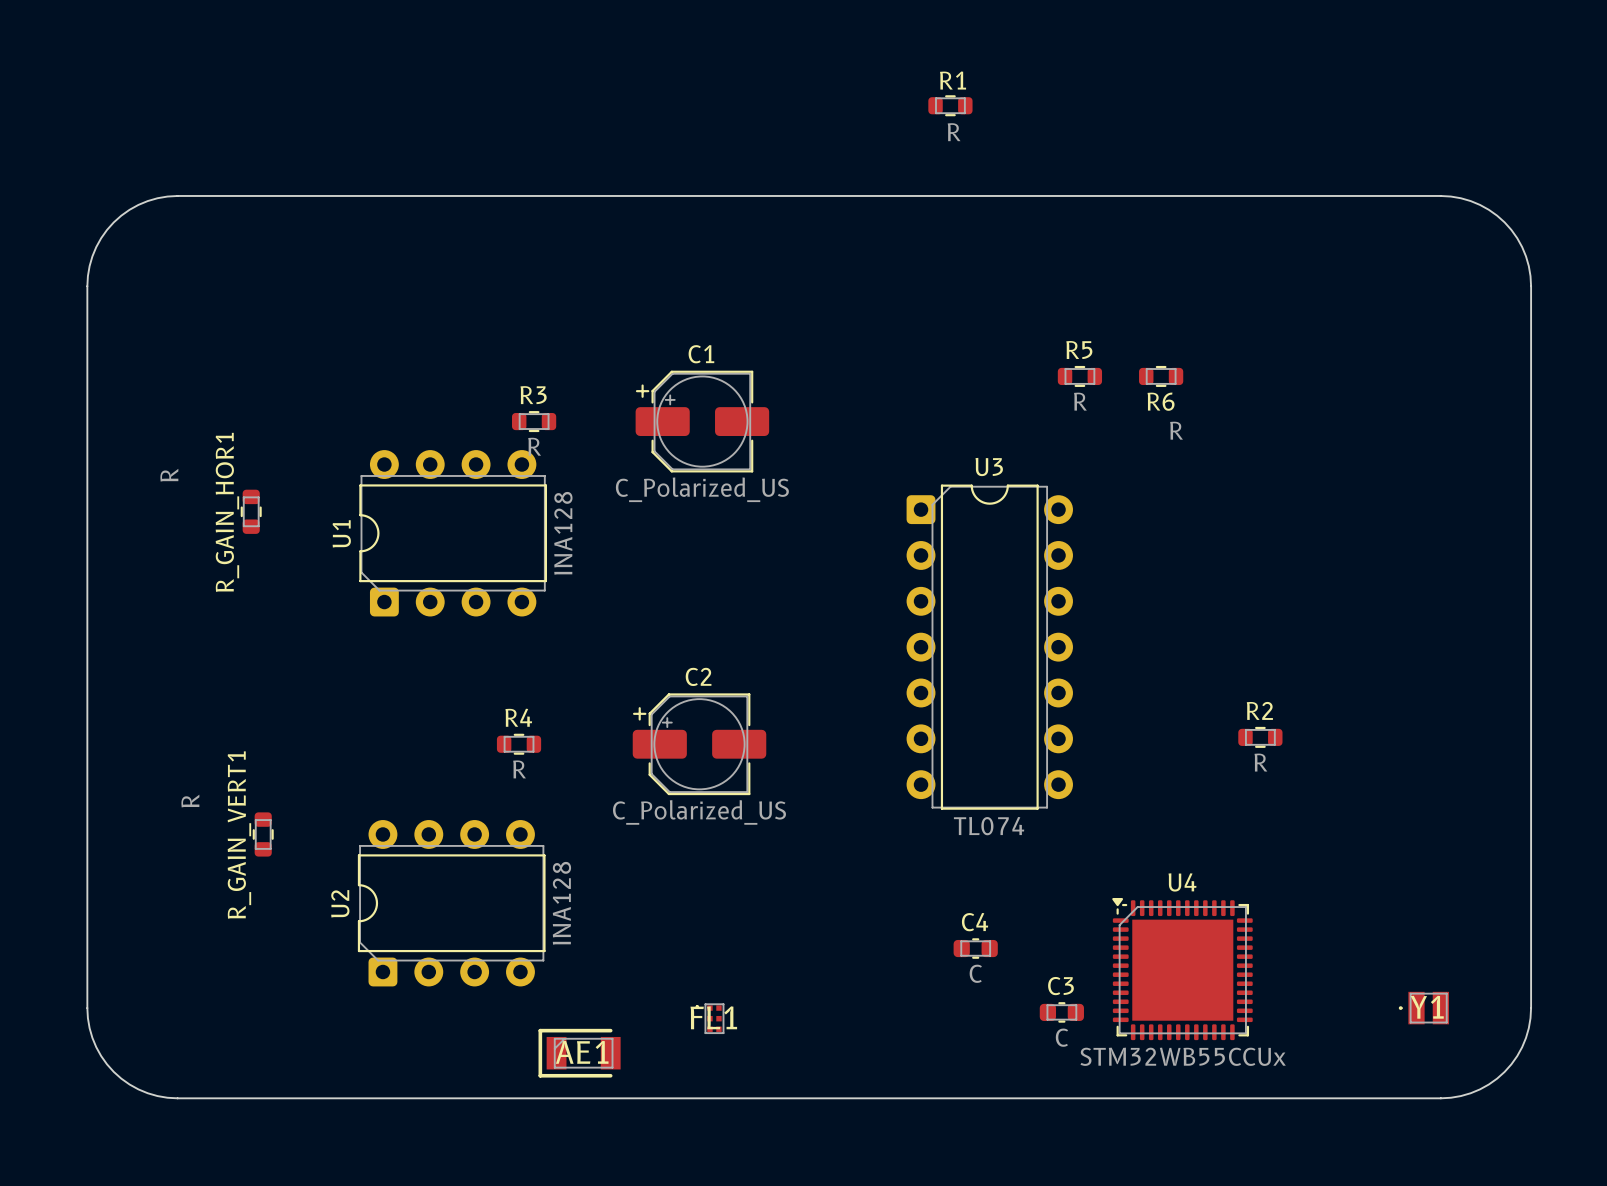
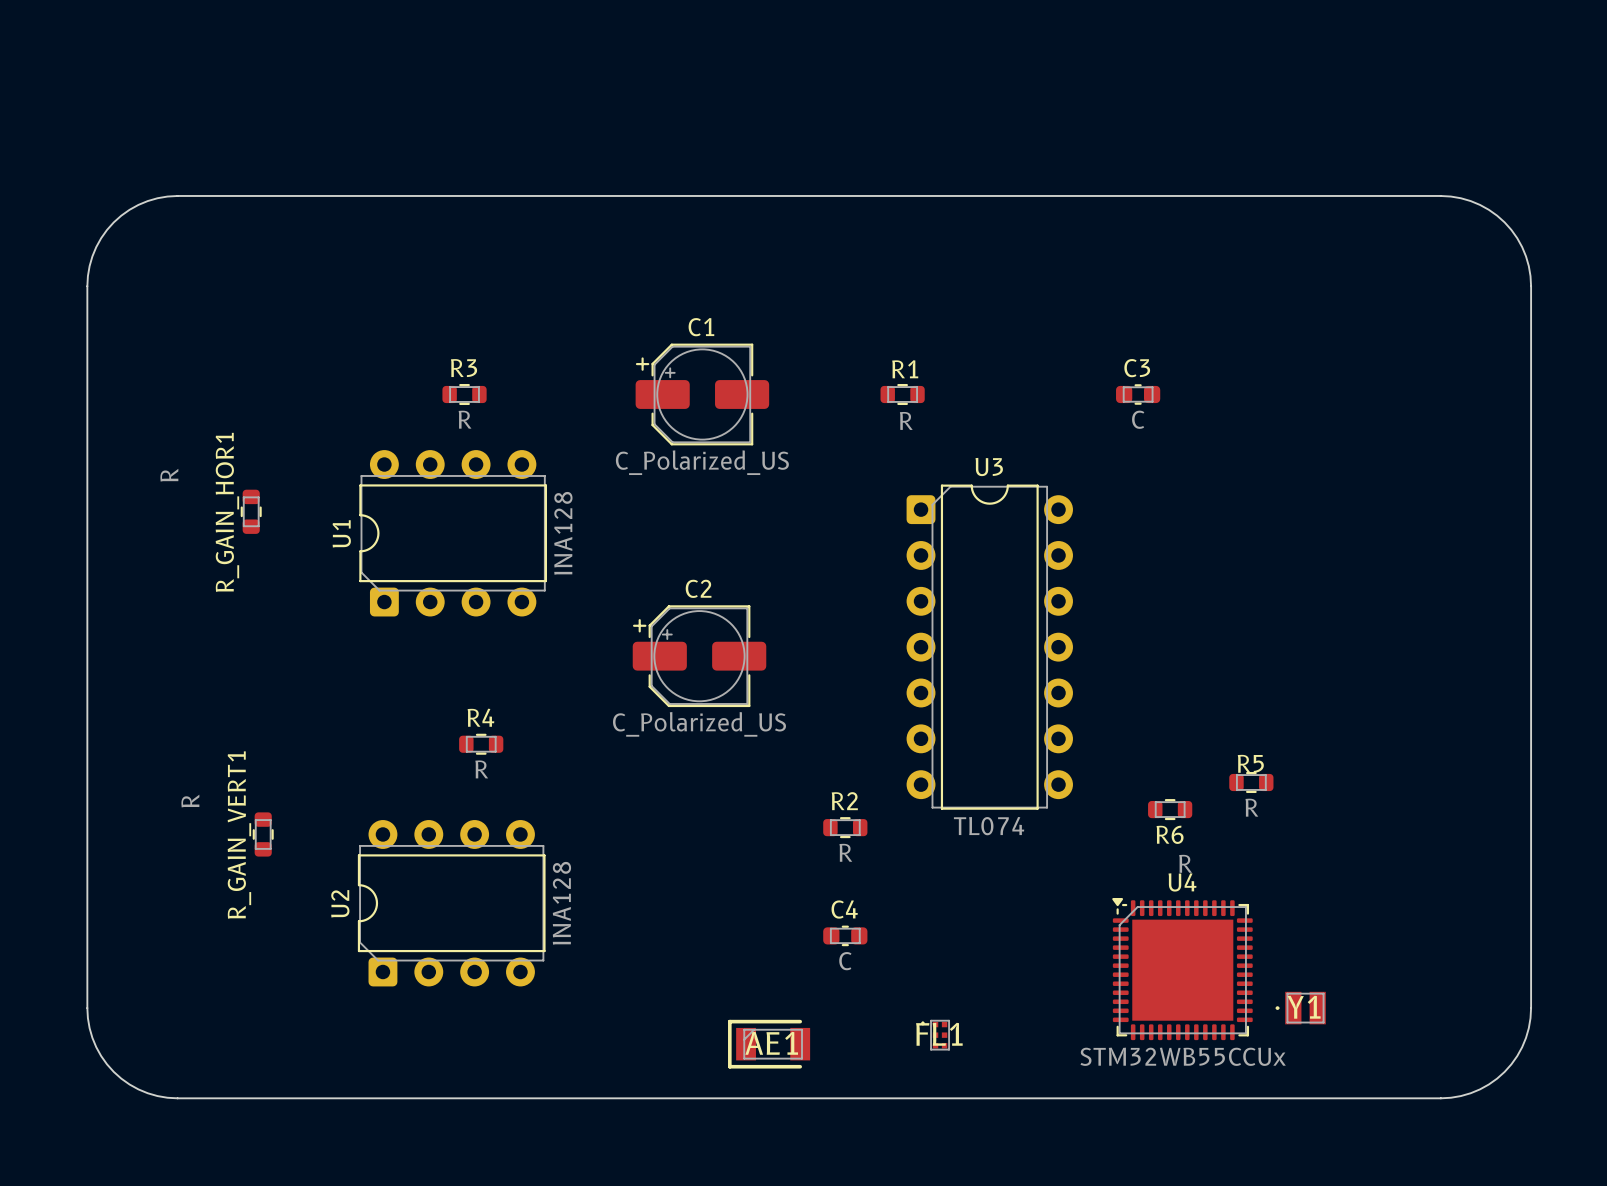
R1 position: (950, 105) -> (902, 394)
R5 name position: R5 (1079, 350) -> R5 (1250, 763)
R5 position: (1079, 376) -> (1251, 782)
R6 position: (1161, 376) -> (1170, 809)
R3 position: (534, 421) -> (464, 394)
C1 position: (702, 421) -> (702, 394)
R2 position: (1260, 737) -> (845, 827)
R4 position: (519, 744) -> (481, 744)
C2 position: (699, 744) -> (699, 656)
C4 position: (975, 948) -> (845, 935)
Y1 position: (1423, 1008) -> (1300, 1008)
C3 position: (1061, 1012) -> (1138, 394)
FL1 position: (709, 1018) -> (935, 1035)
AE1 position: (579, 1053) -> (769, 1044)

